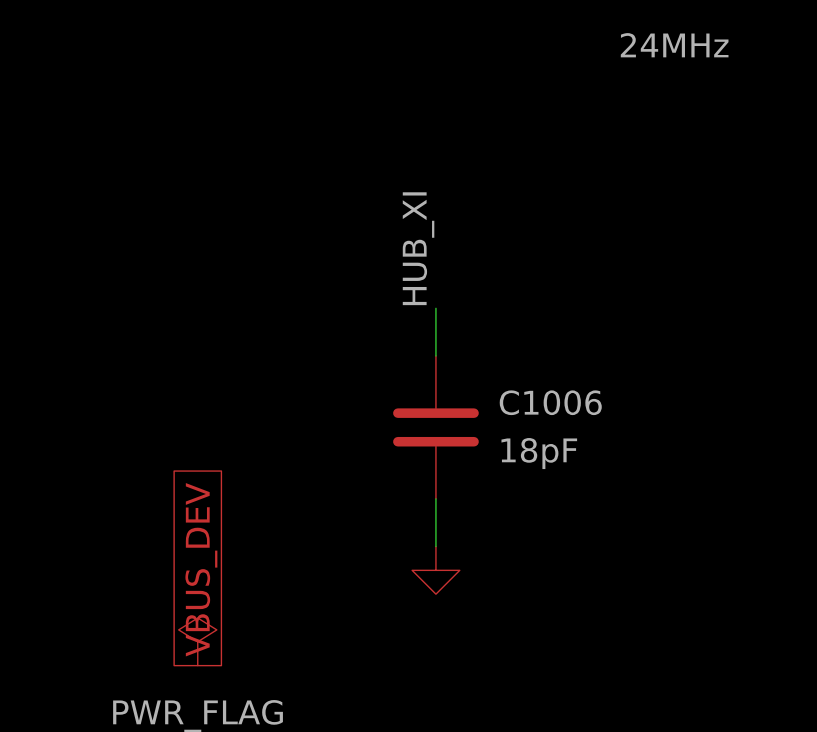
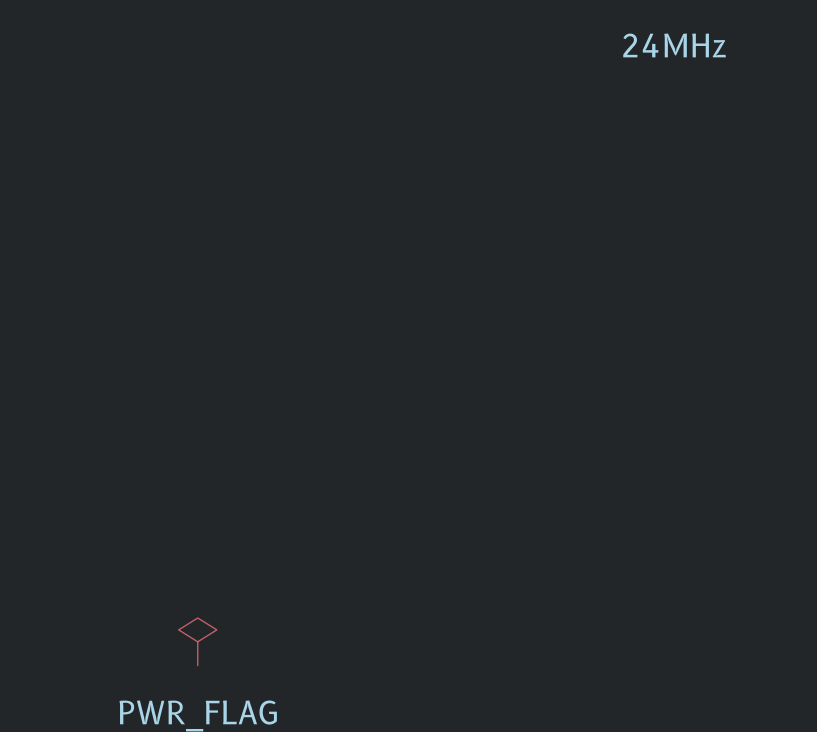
label: HUB_XI (418, 248) -> none
wire: (435, 308) (435, 355) -> none
C1006: 18pF (435, 427) -> none
wire: (435, 498) (435, 546) -> none
global label: VBUS_DEV (201, 569) -> none
power symbol: (435, 570) -> none

